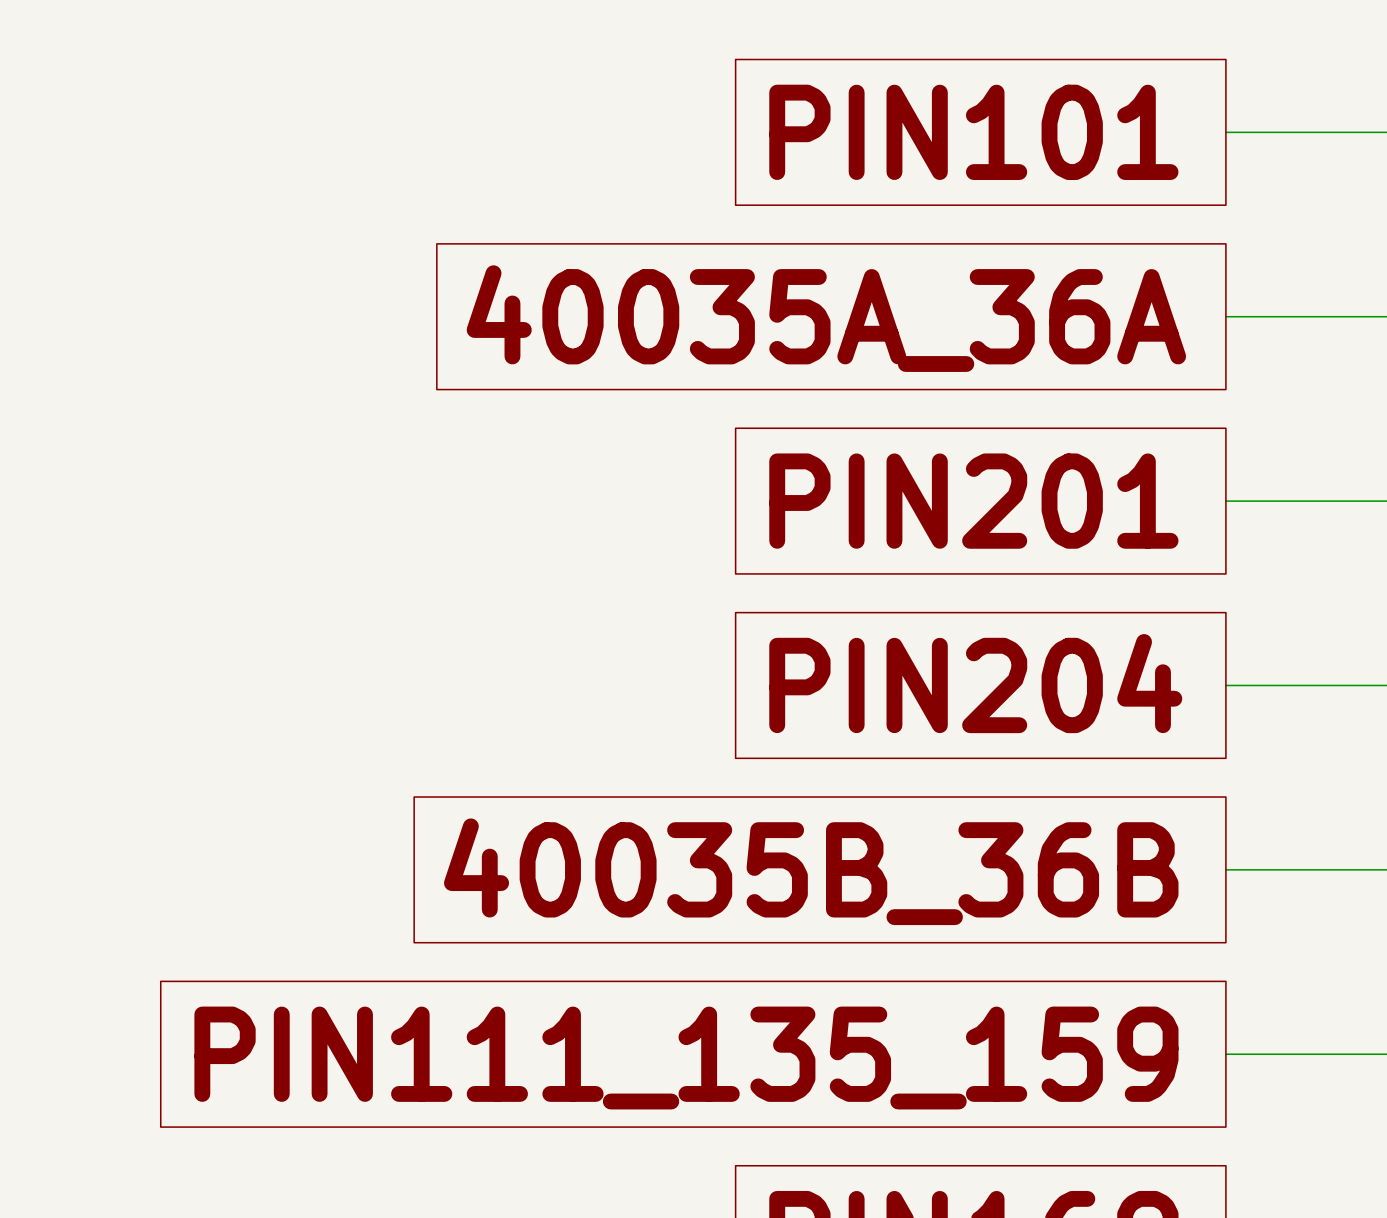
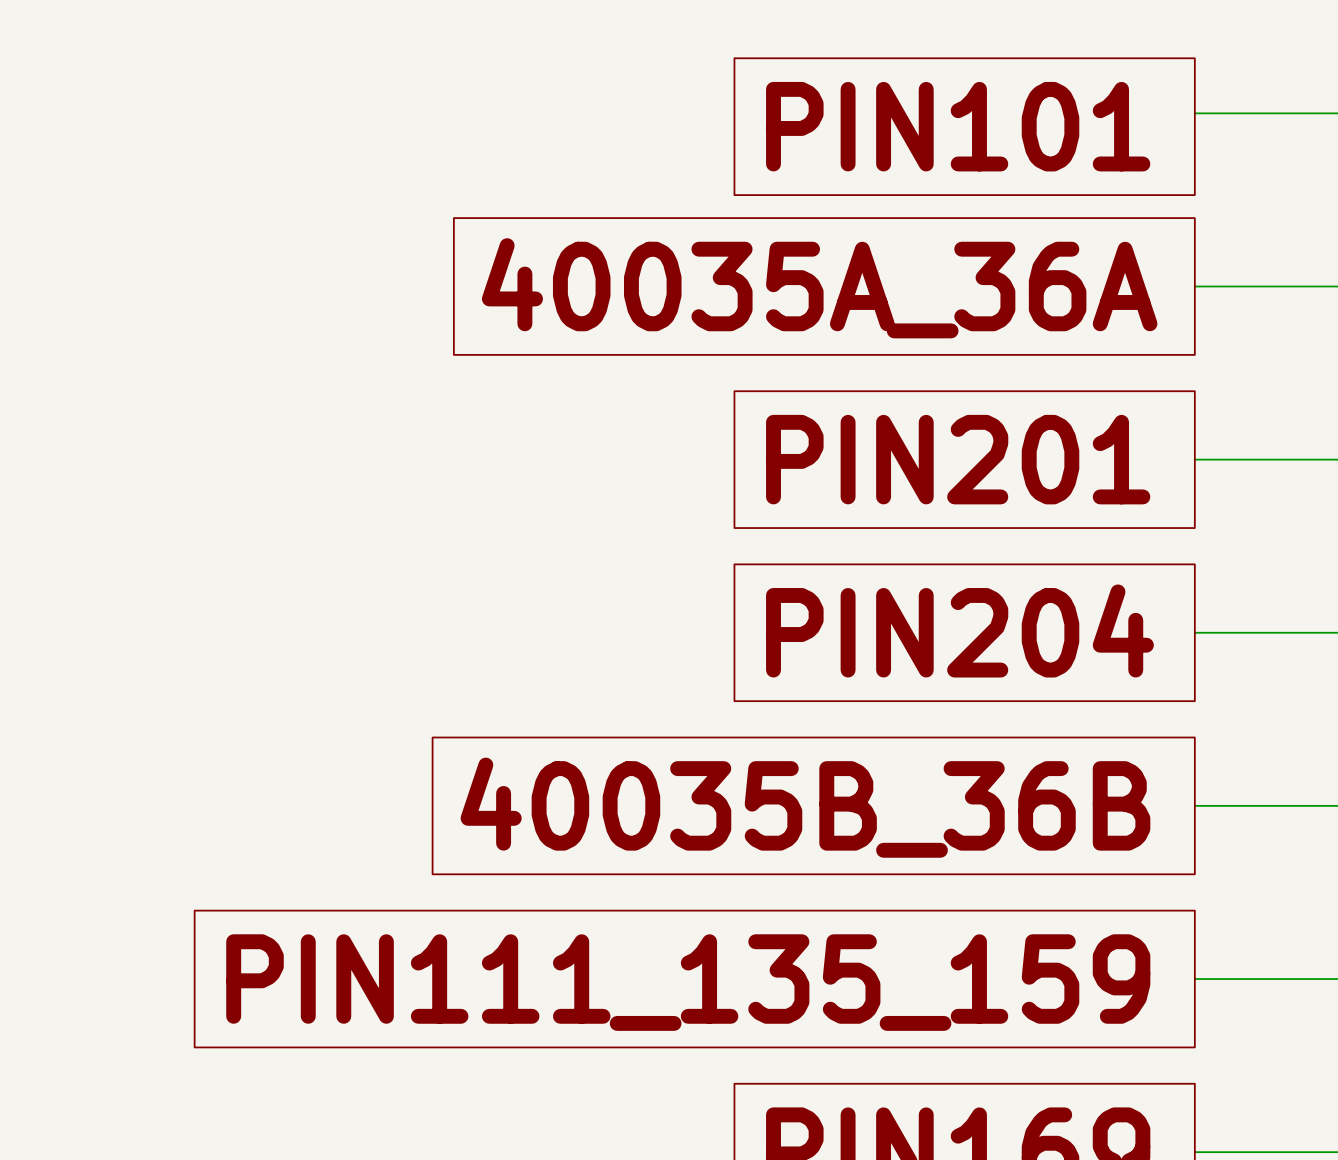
global label position: PIN101 (973, 132) -> PIN101 (958, 126)

